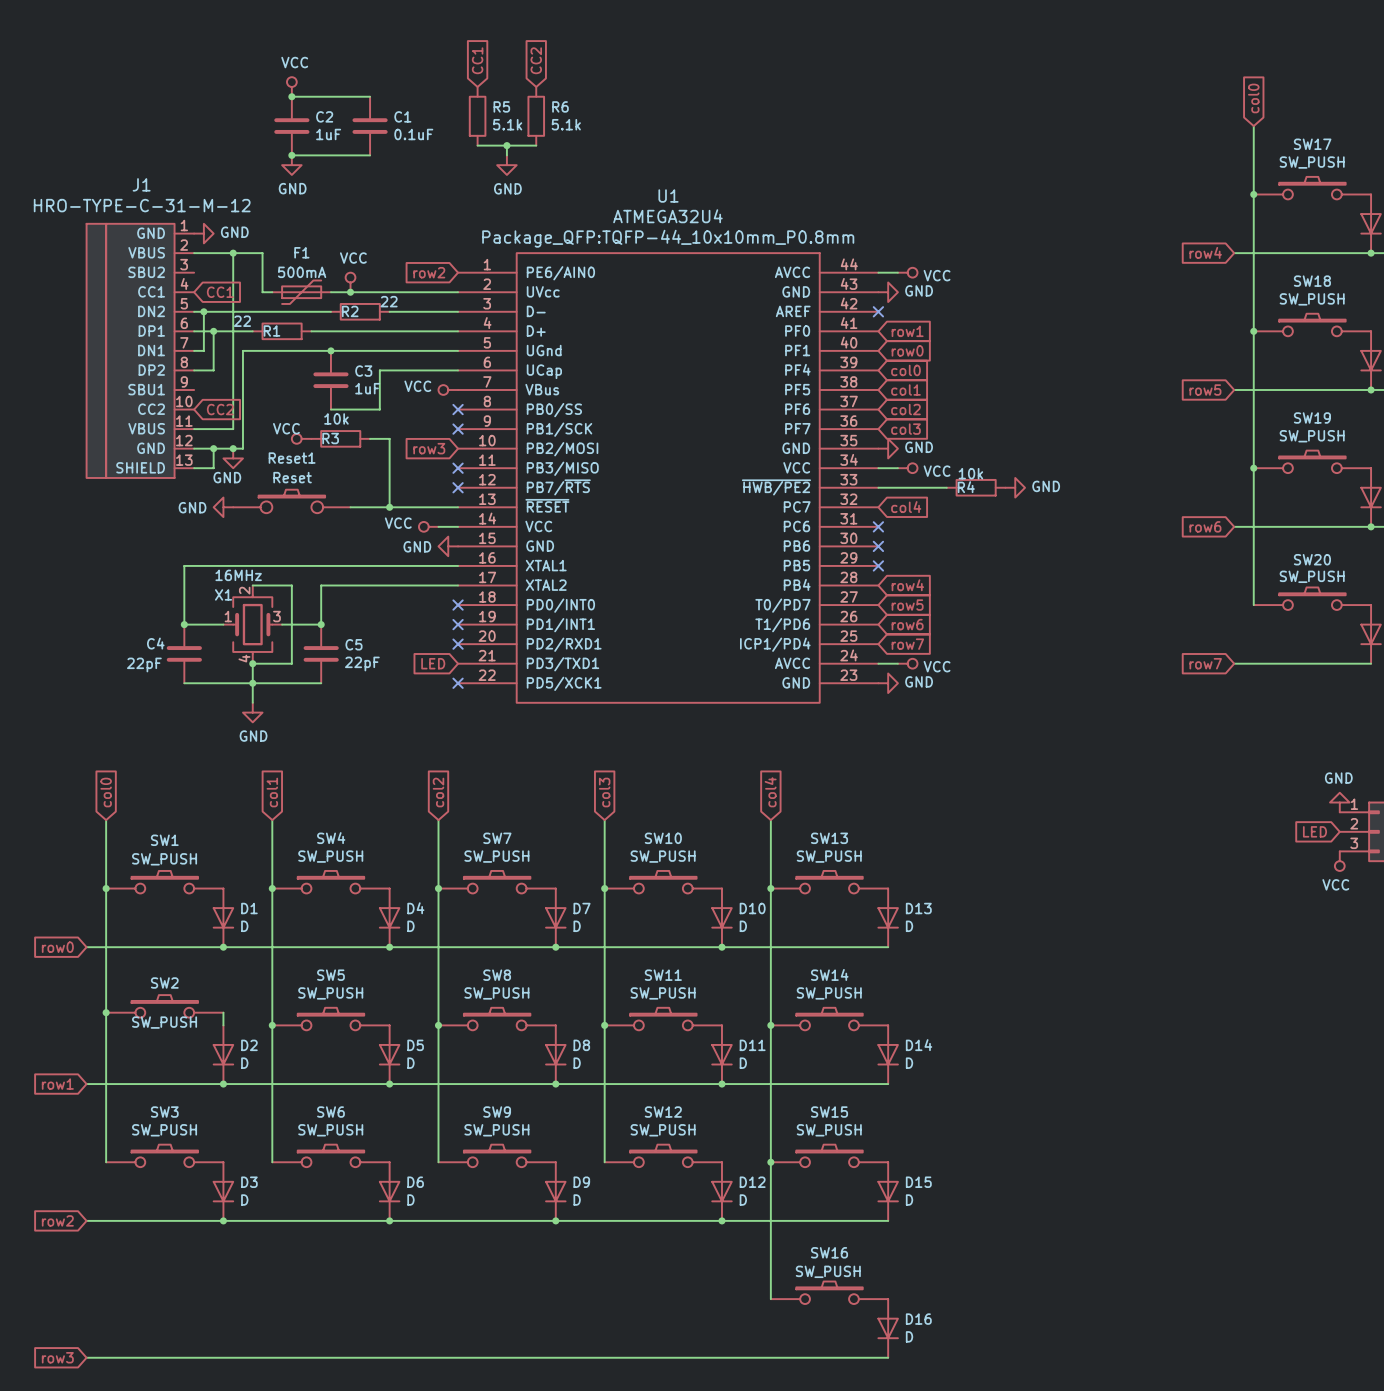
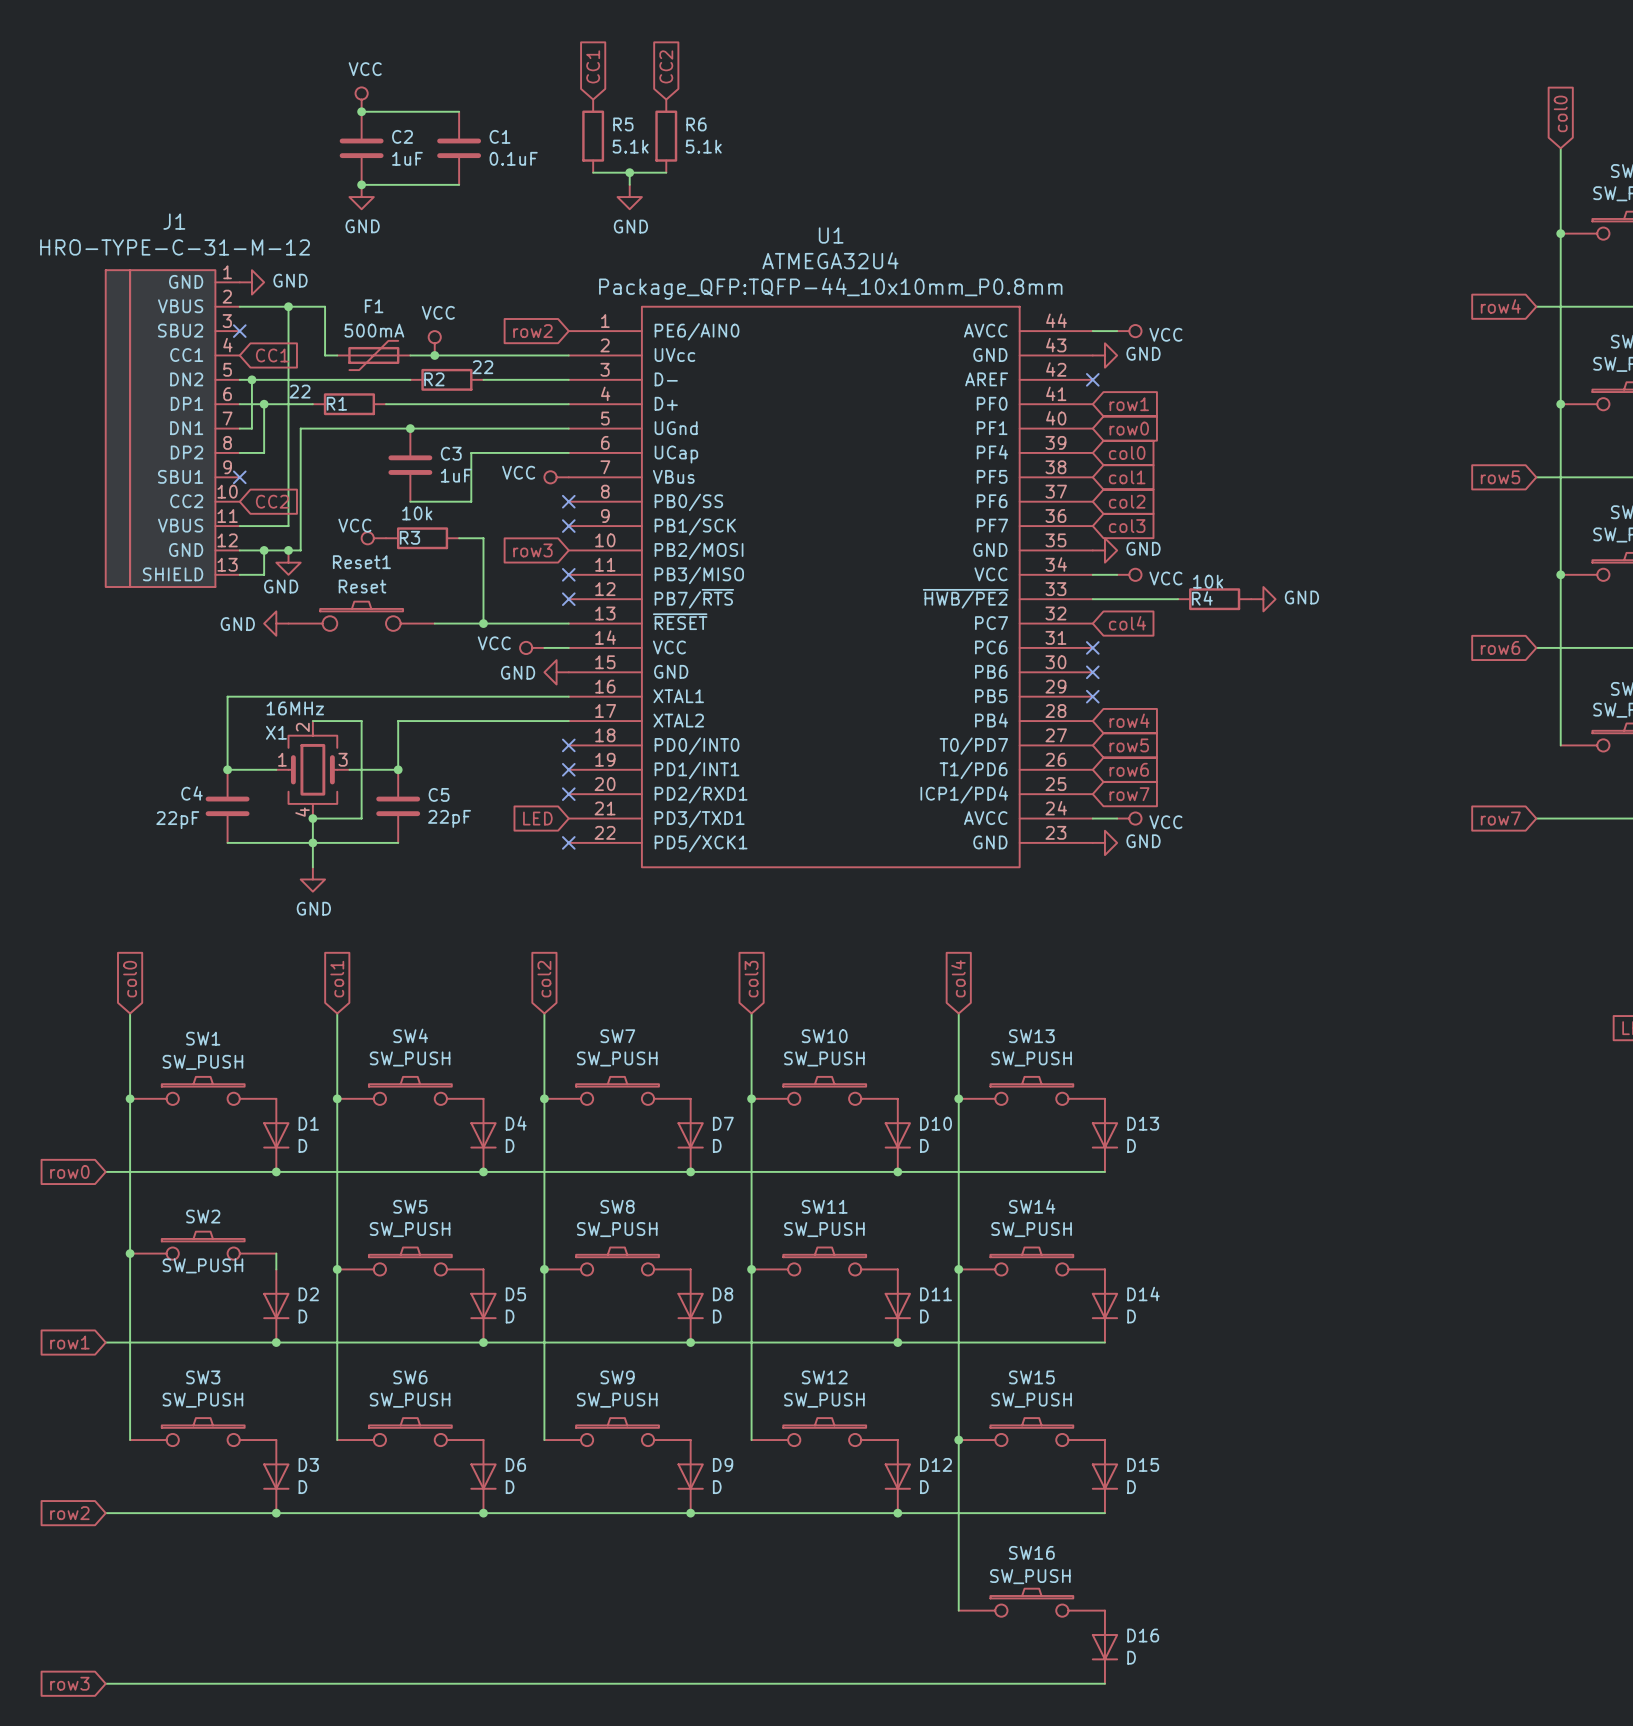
no-connect mark: none -> (239, 331)
no-connect mark: none -> (239, 477)

